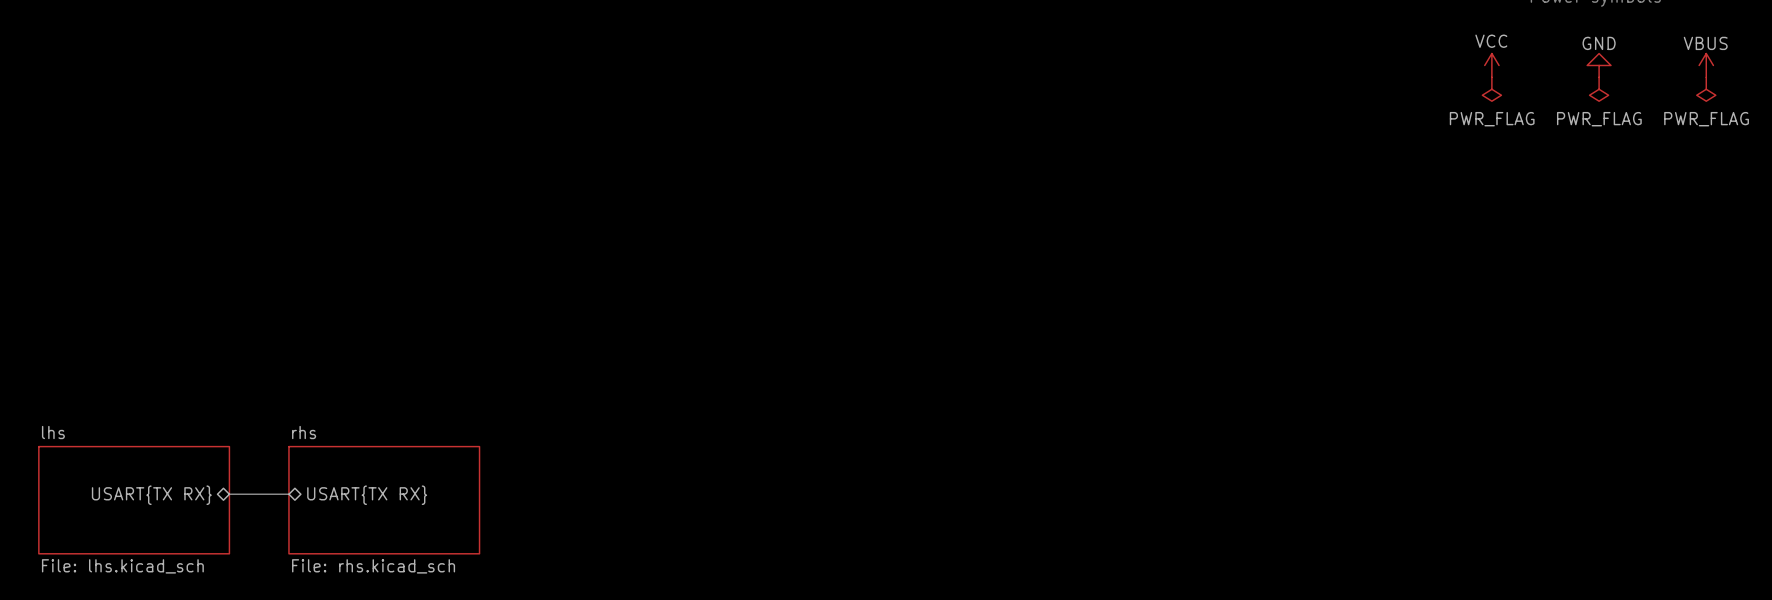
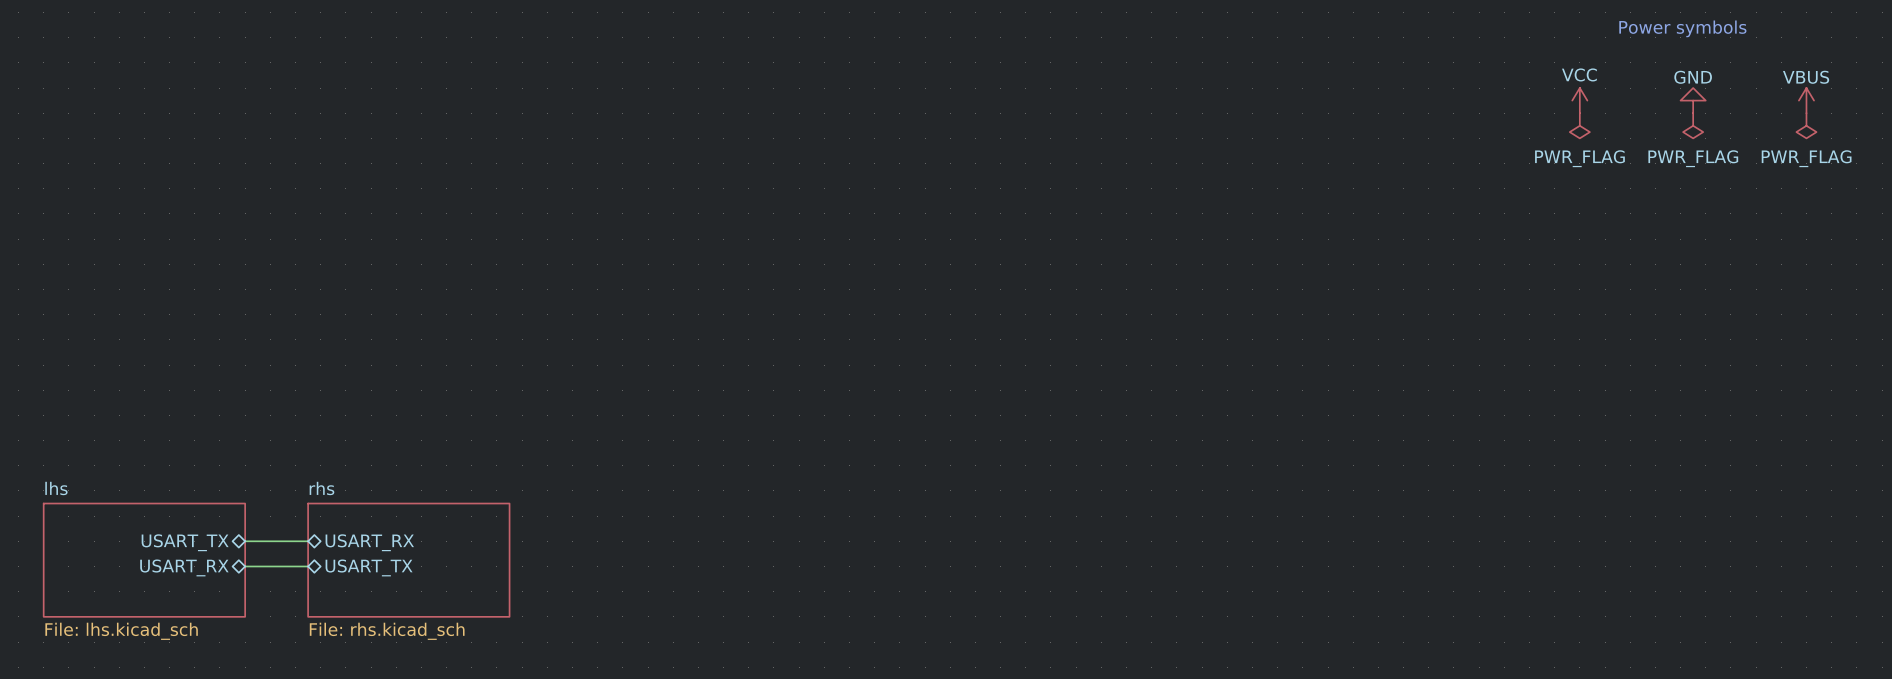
sheet pin: none -> USART_TX (185, 542)
wire: none -> (245, 541) (308, 541)
sheet pin: none -> USART_RX (369, 542)
bus: (229, 494) (288, 494) -> none
sheet pin: USART{TX RX} (151, 495) -> none
sheet pin: USART{TX RX} (367, 495) -> none
sheet pin: none -> USART_RX (184, 567)
wire: none -> (245, 566) (308, 566)
sheet pin: none -> USART_TX (369, 567)

